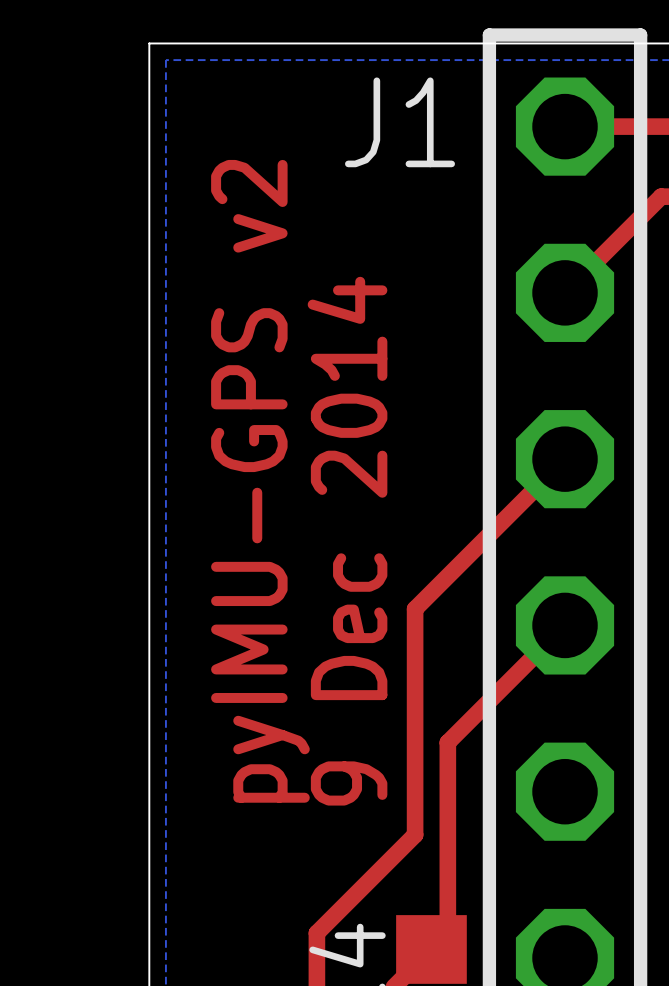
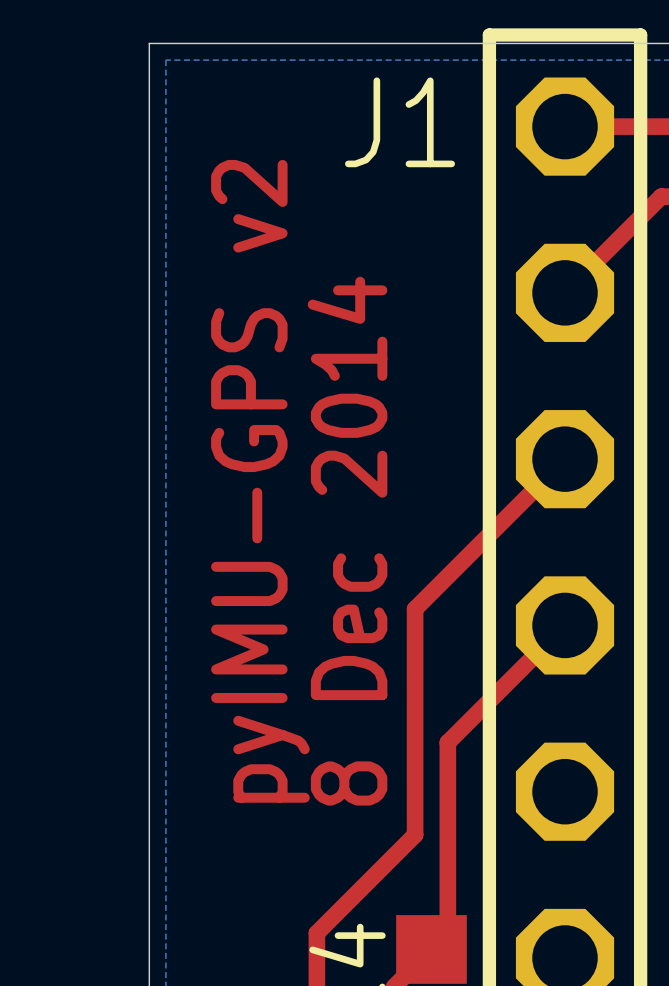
text: 9 Dec 2014 (347, 541) -> 8 Dec 2014 (347, 541)

